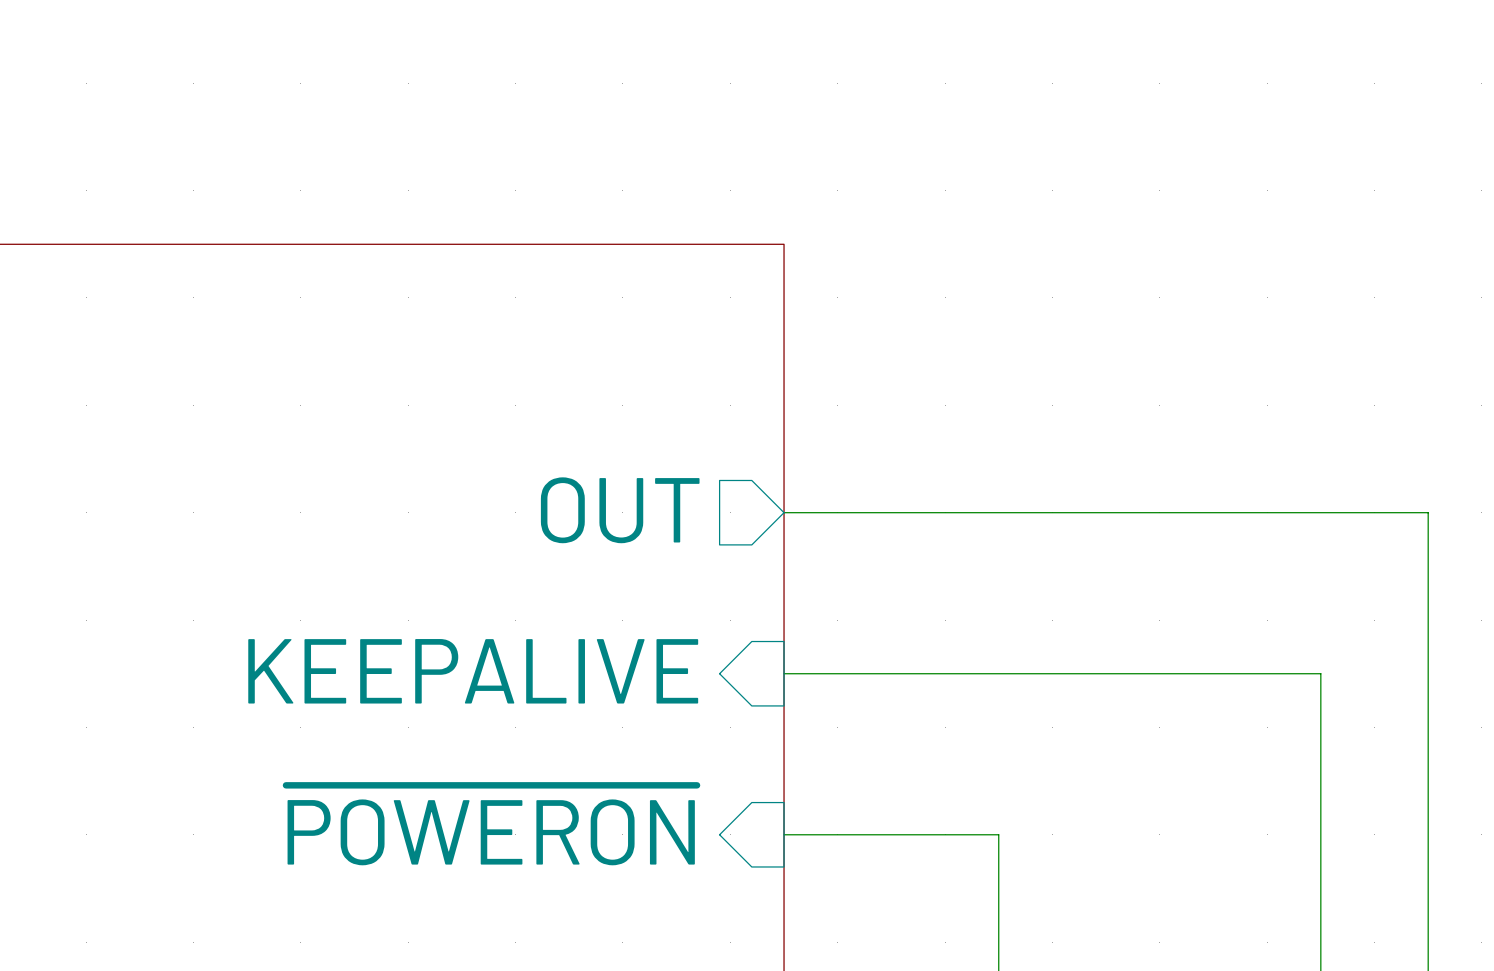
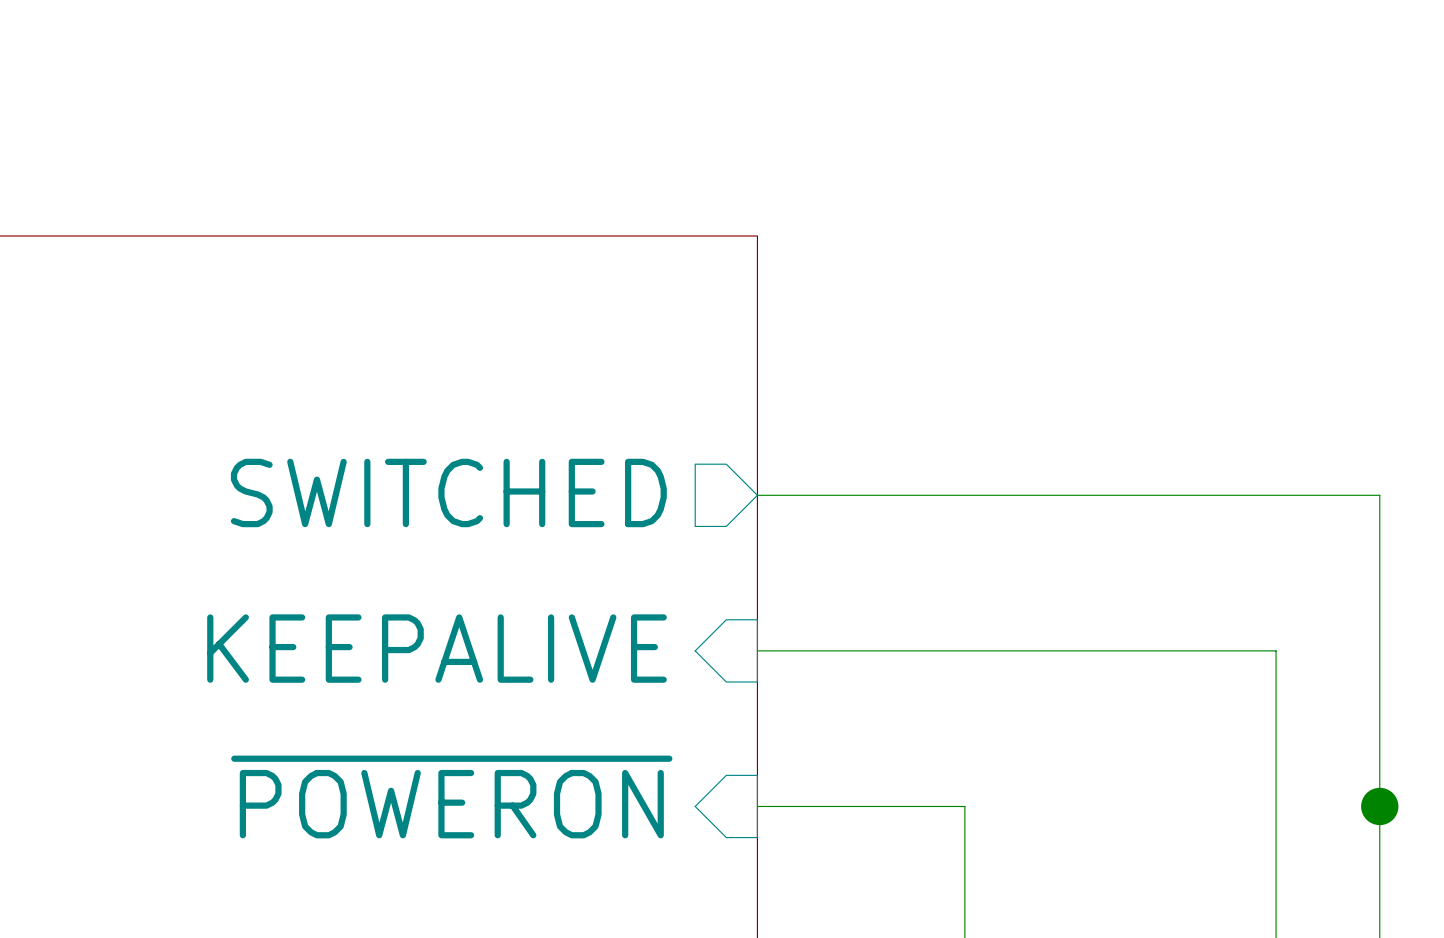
sheet pin: OUT (620, 510) -> SWITCHED (448, 492)
junction: none -> (1379, 806)

